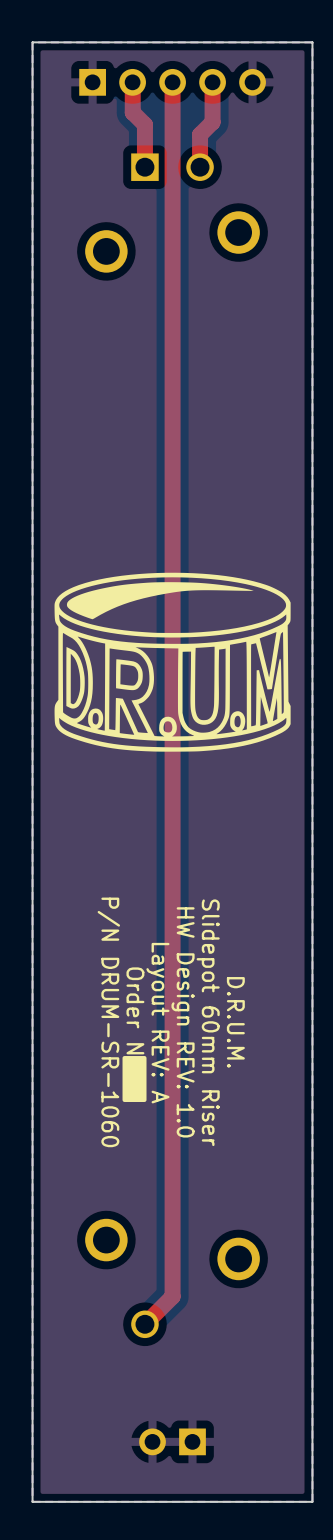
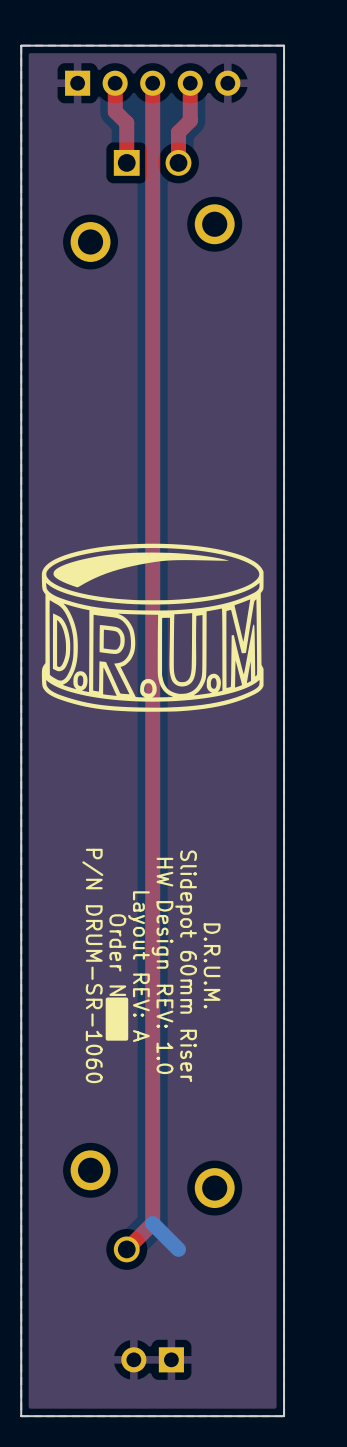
bottom track: none -> (152, 1223) (178, 1249)

